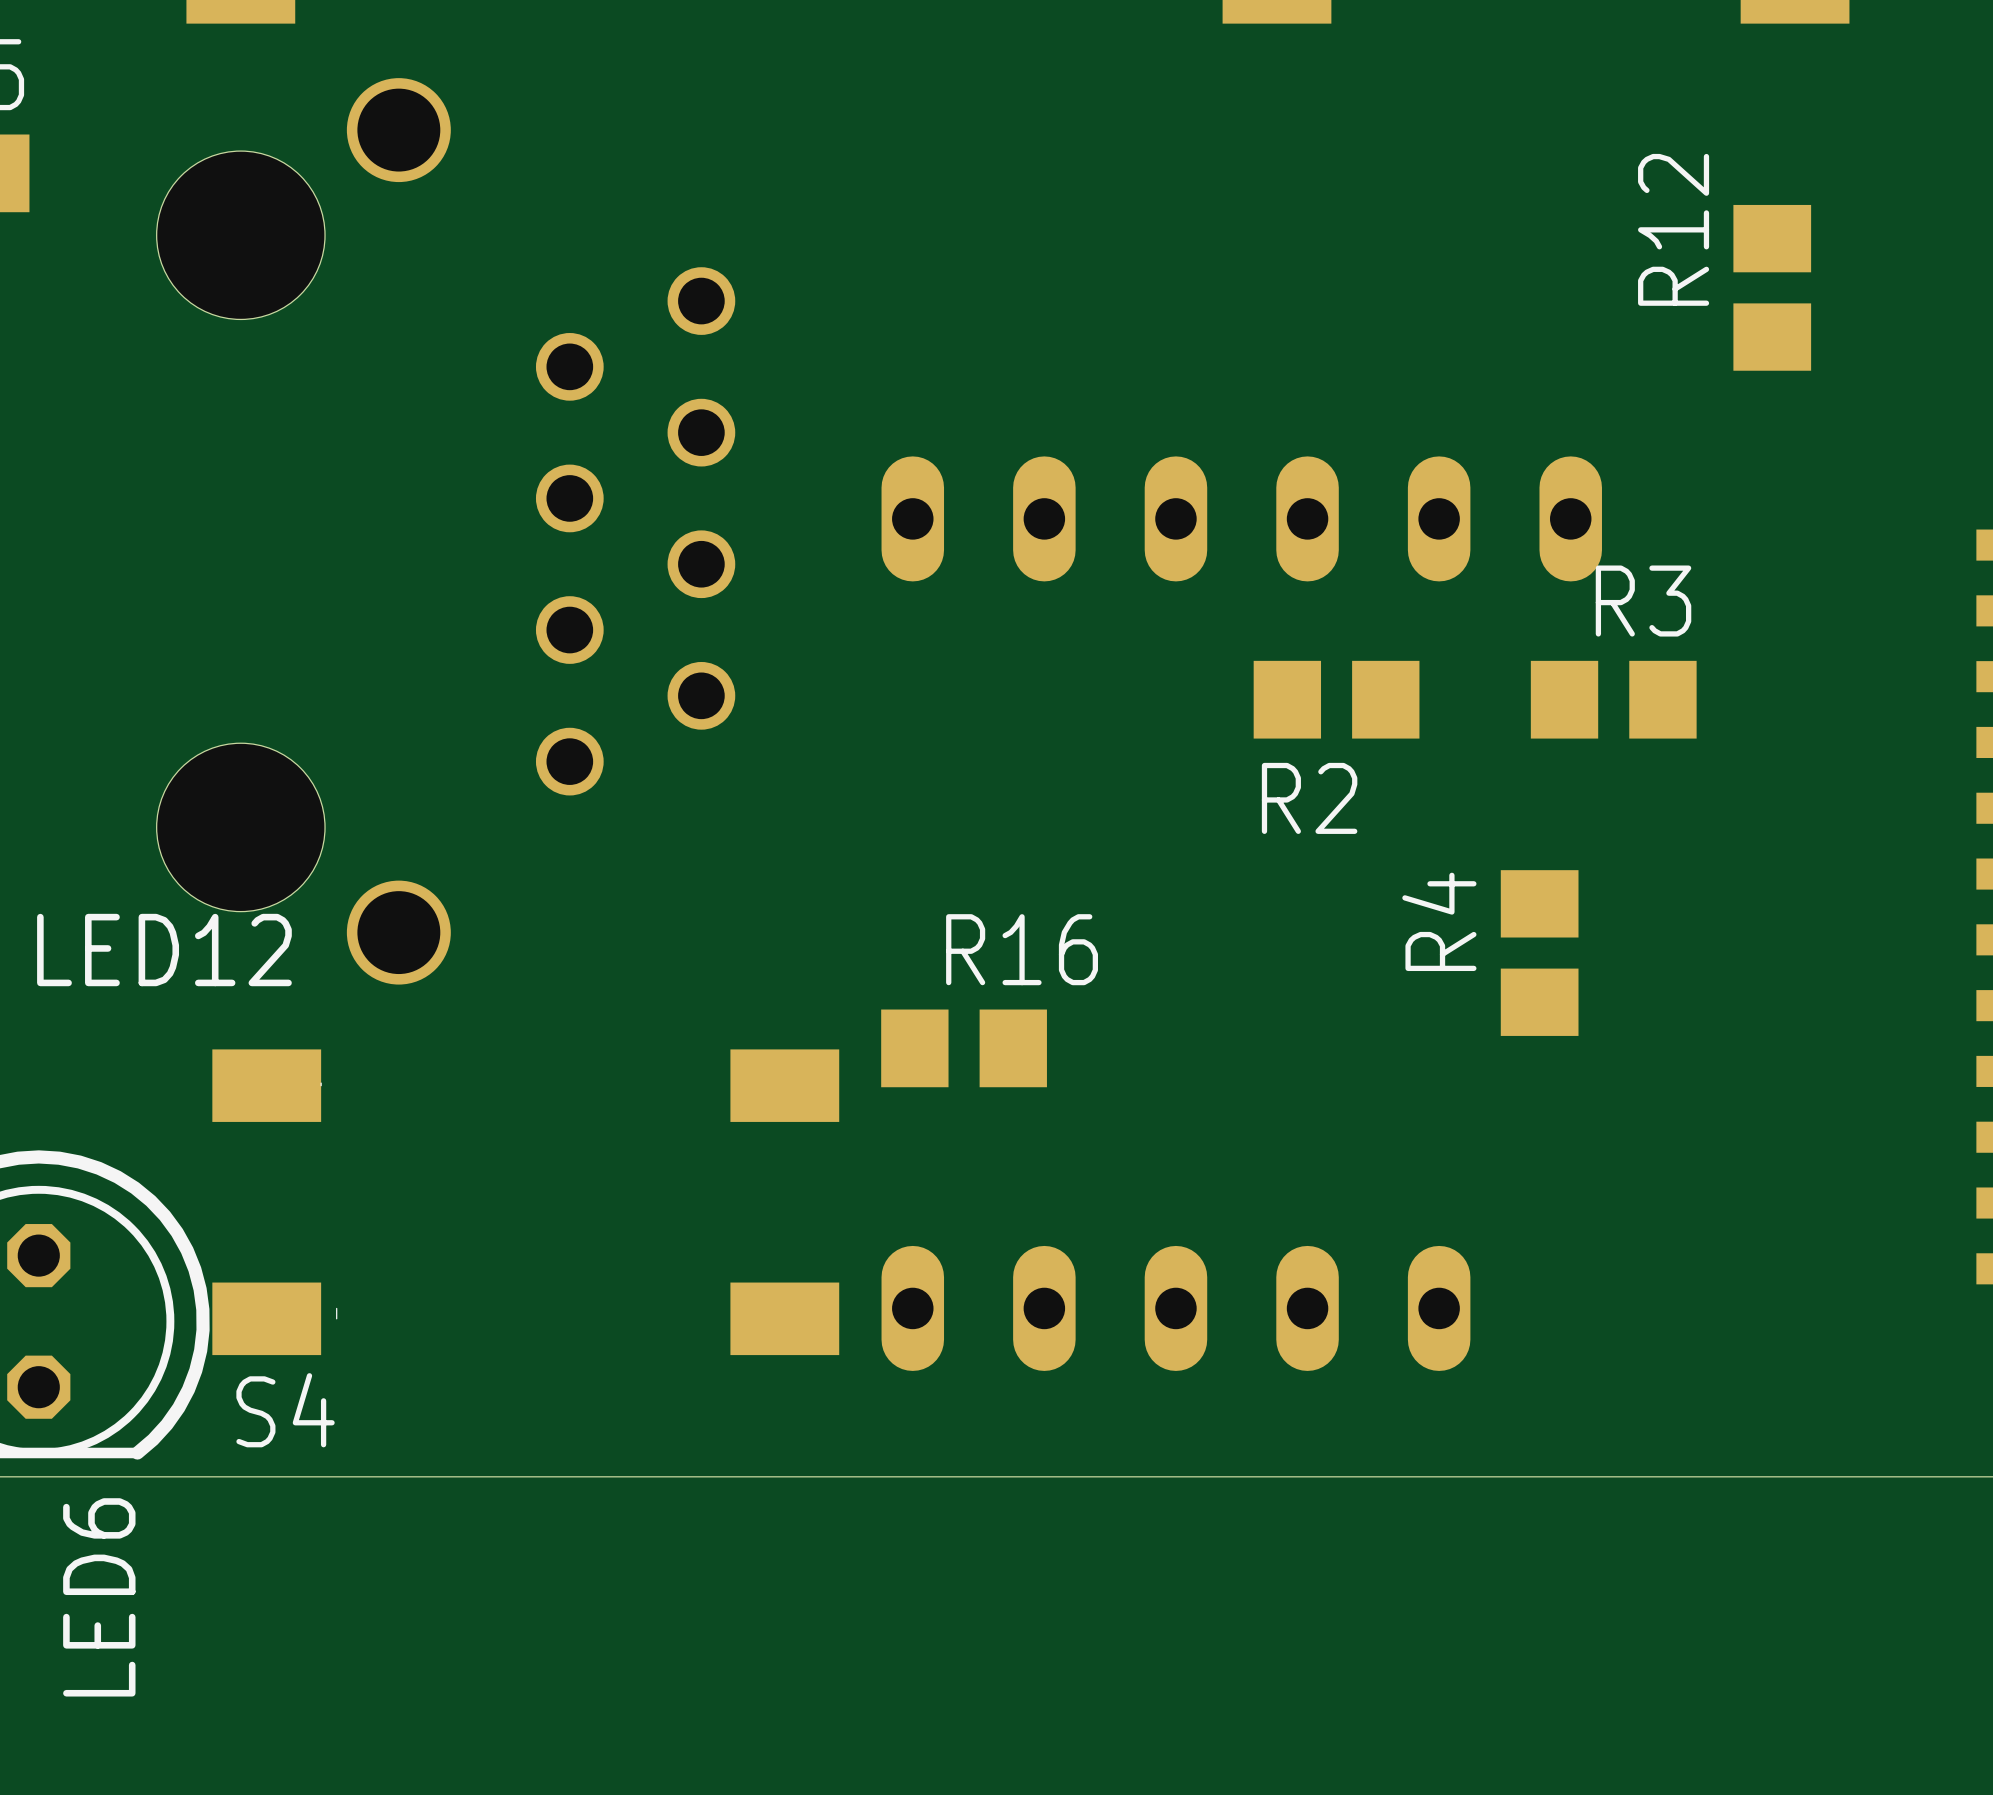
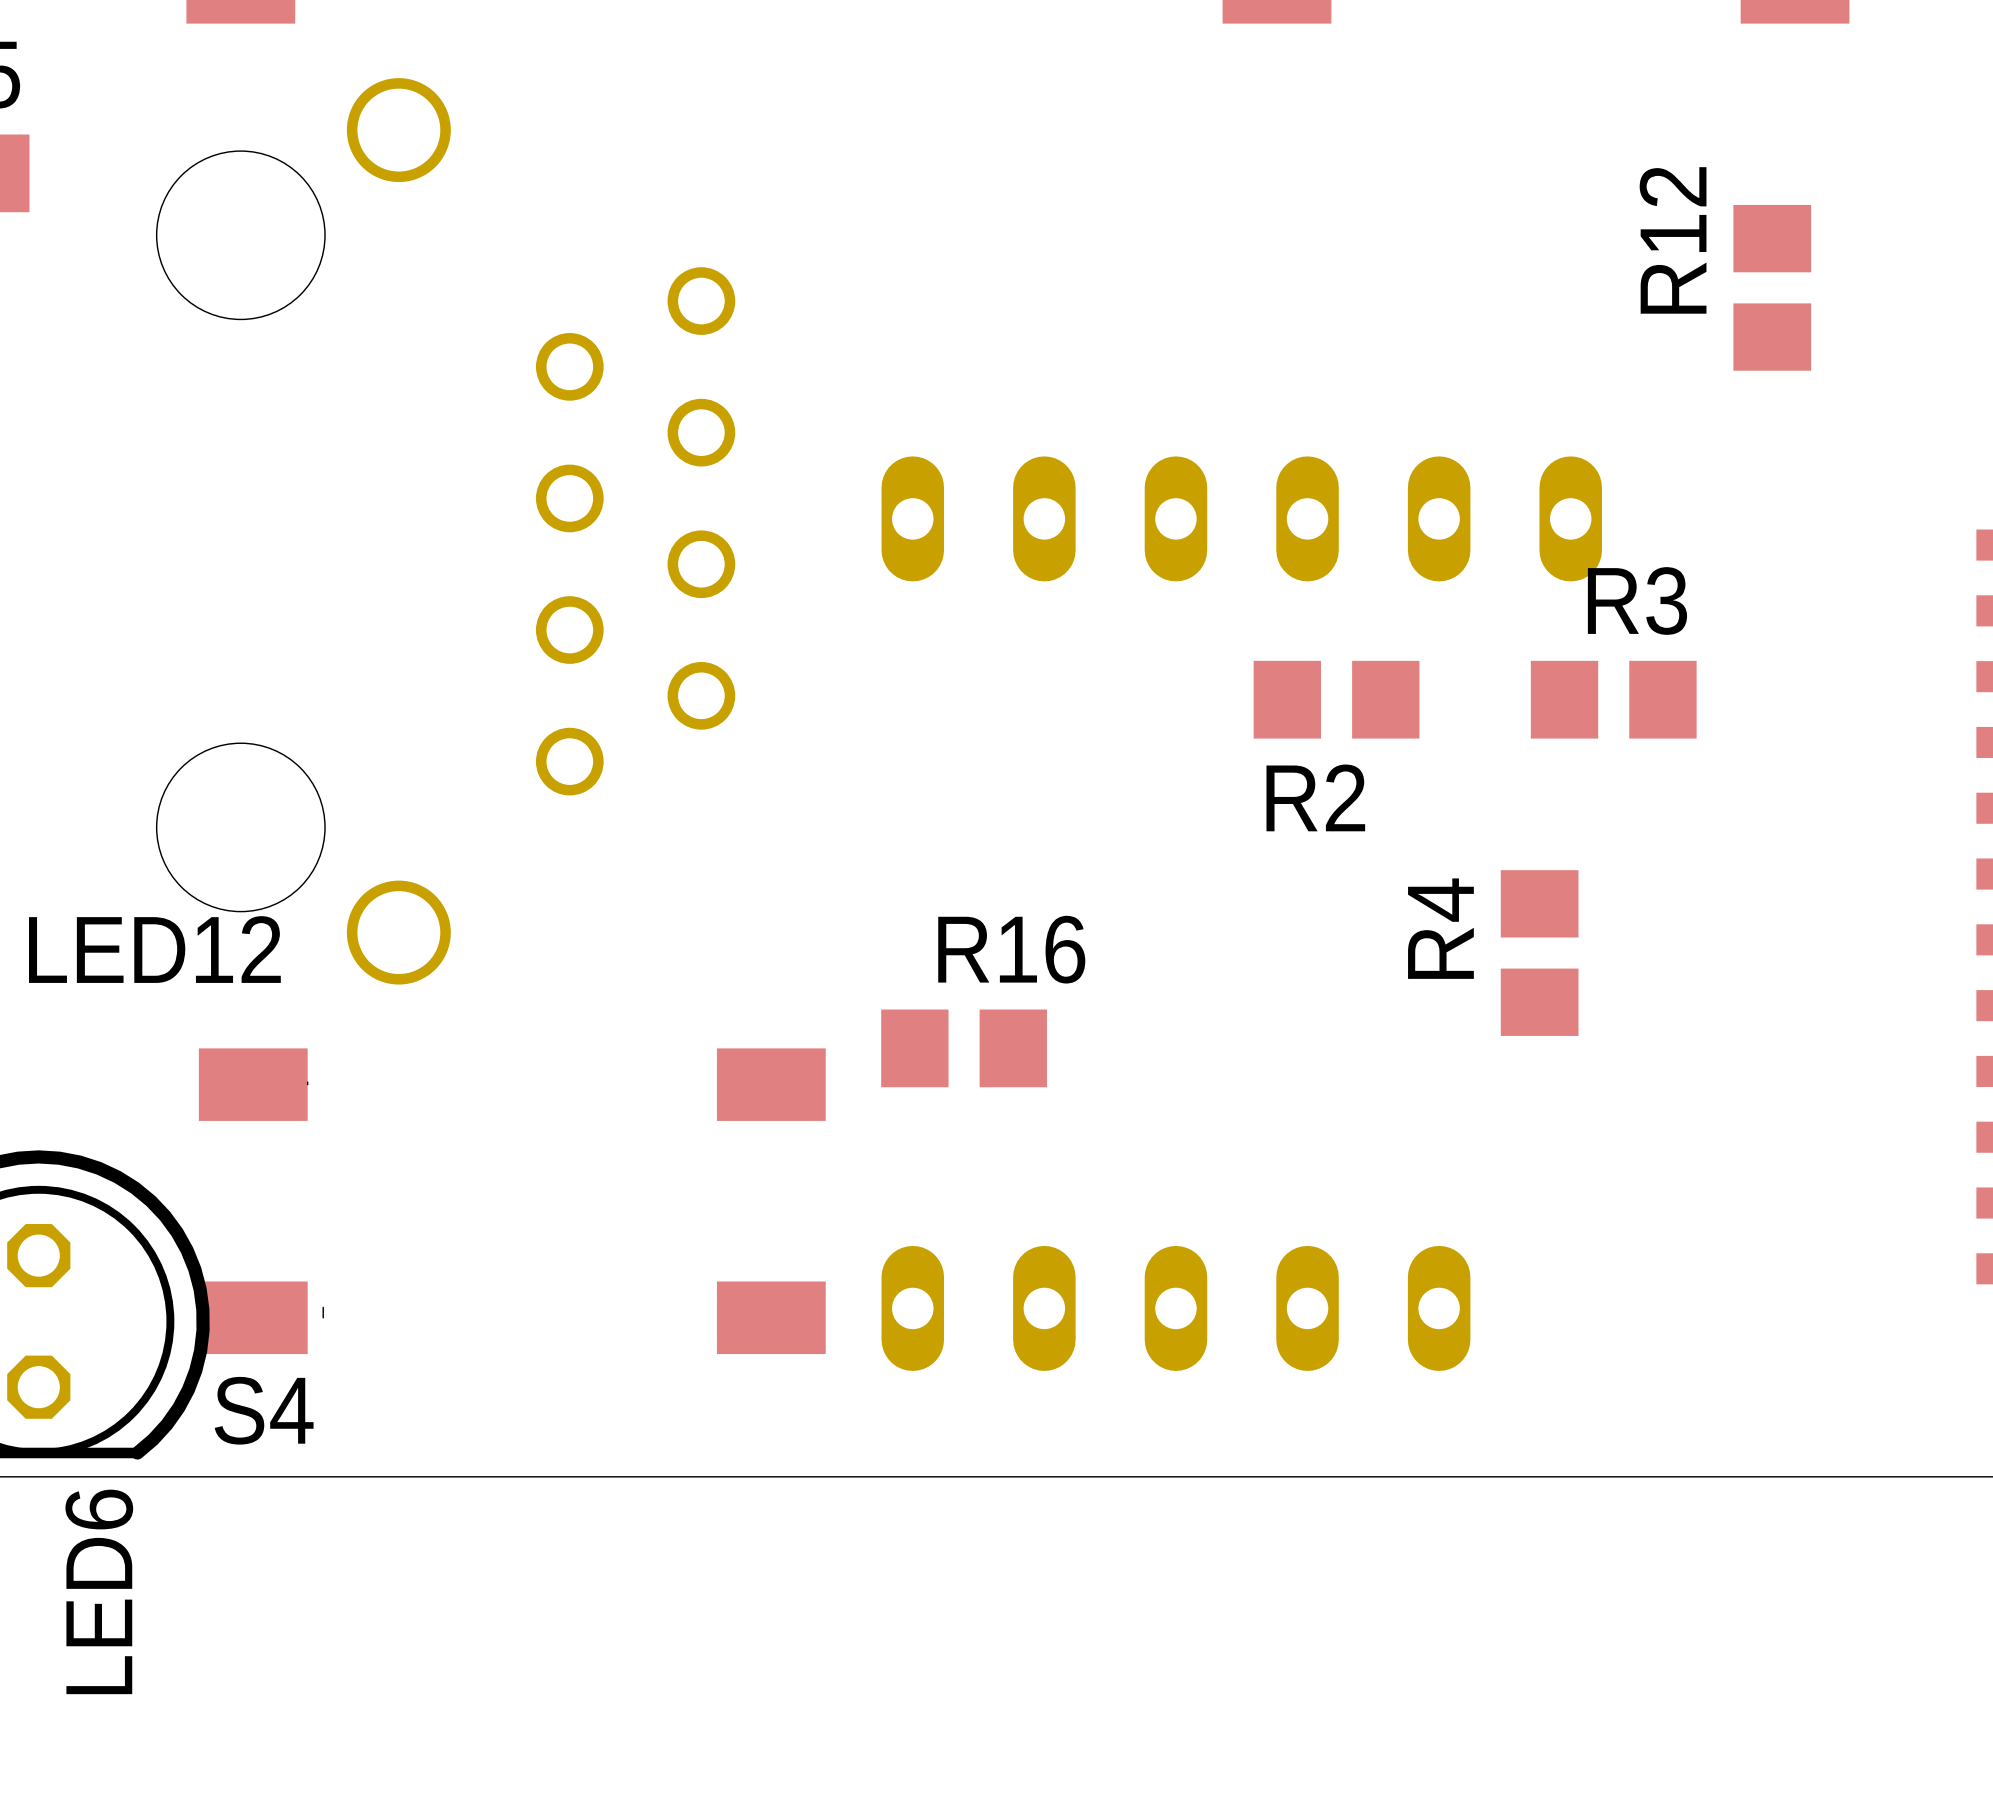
S4 position: (525, 1202) -> (512, 1201)

